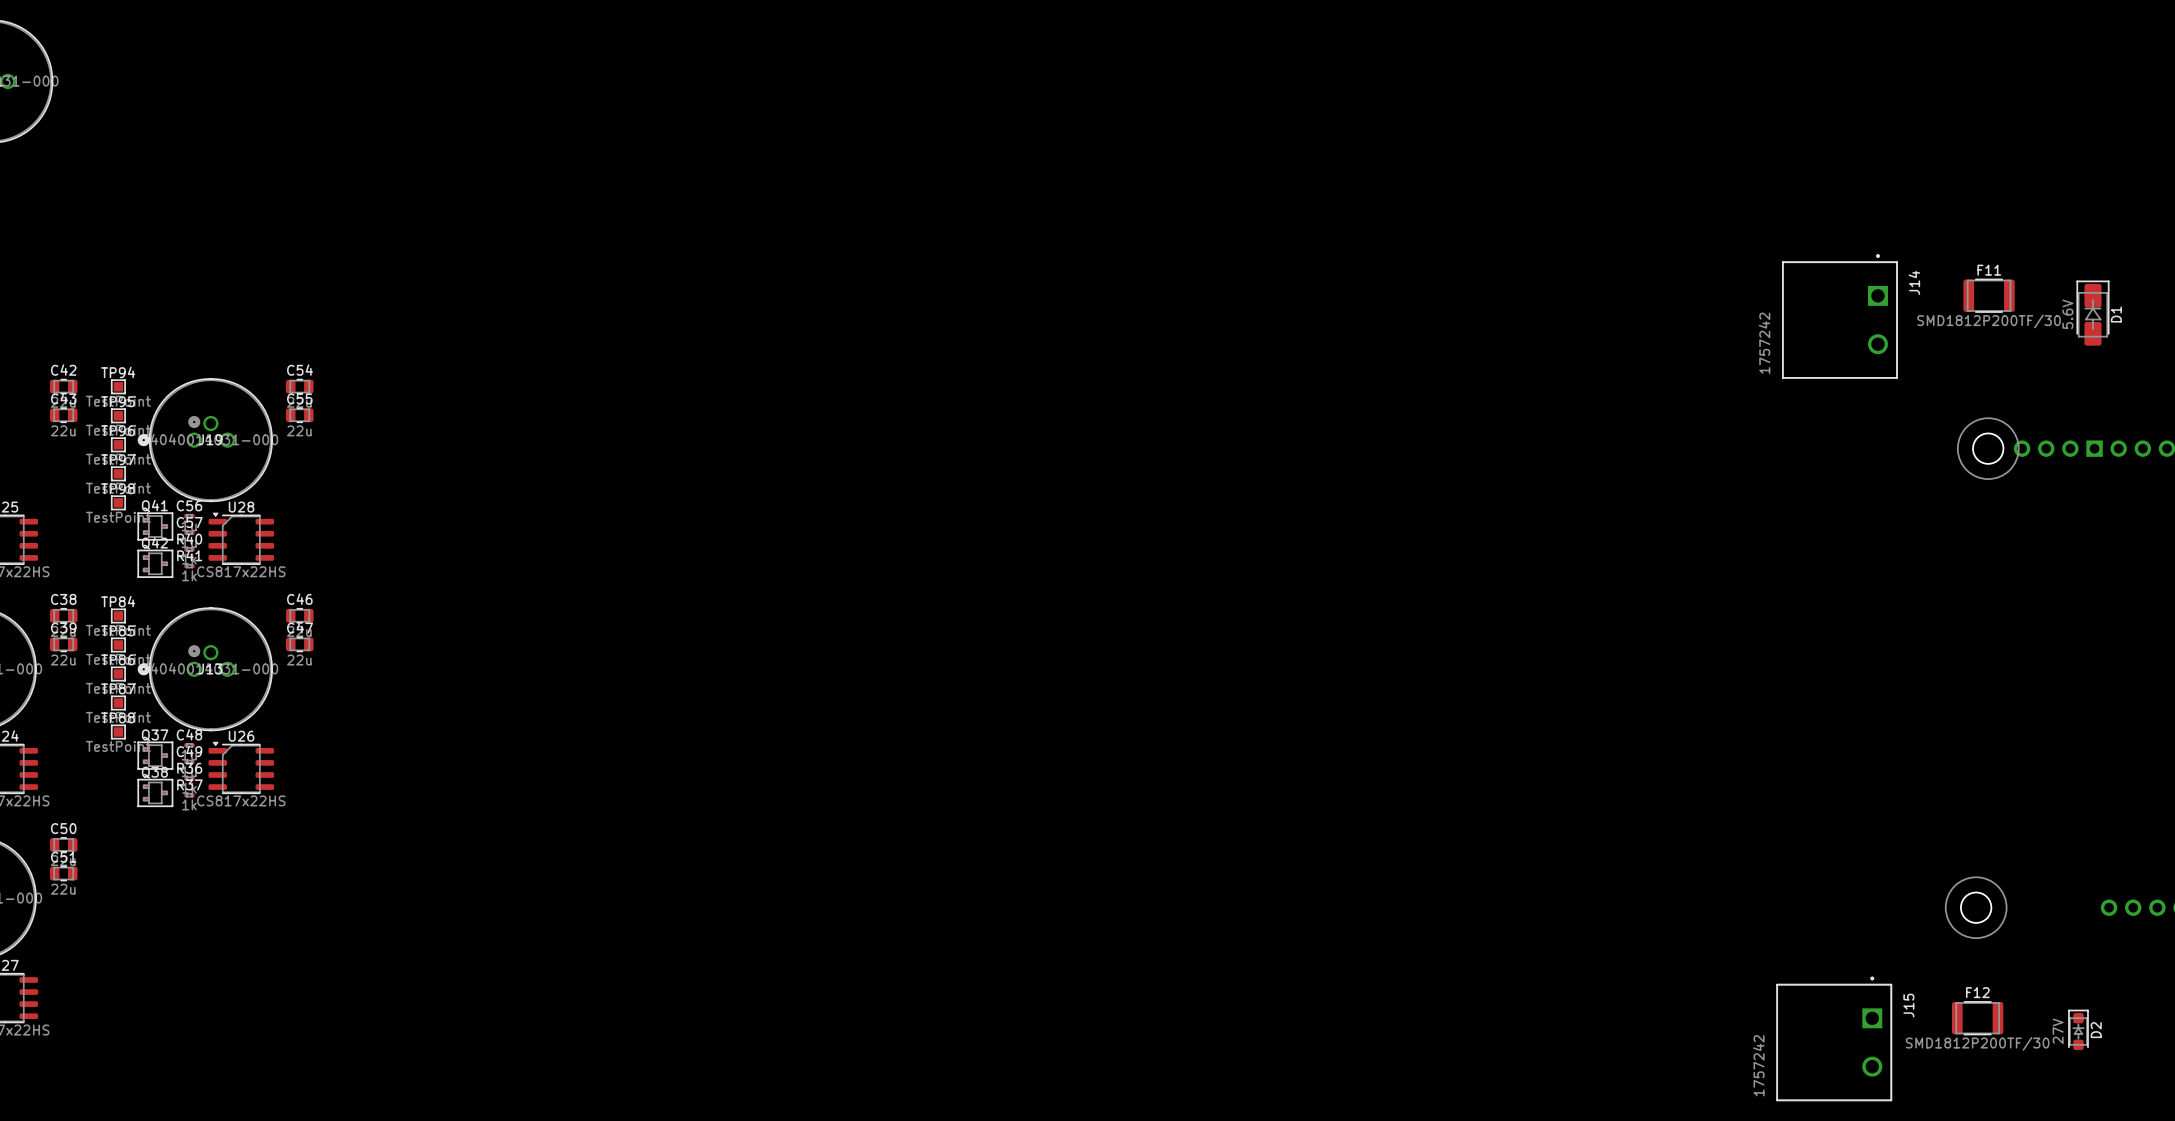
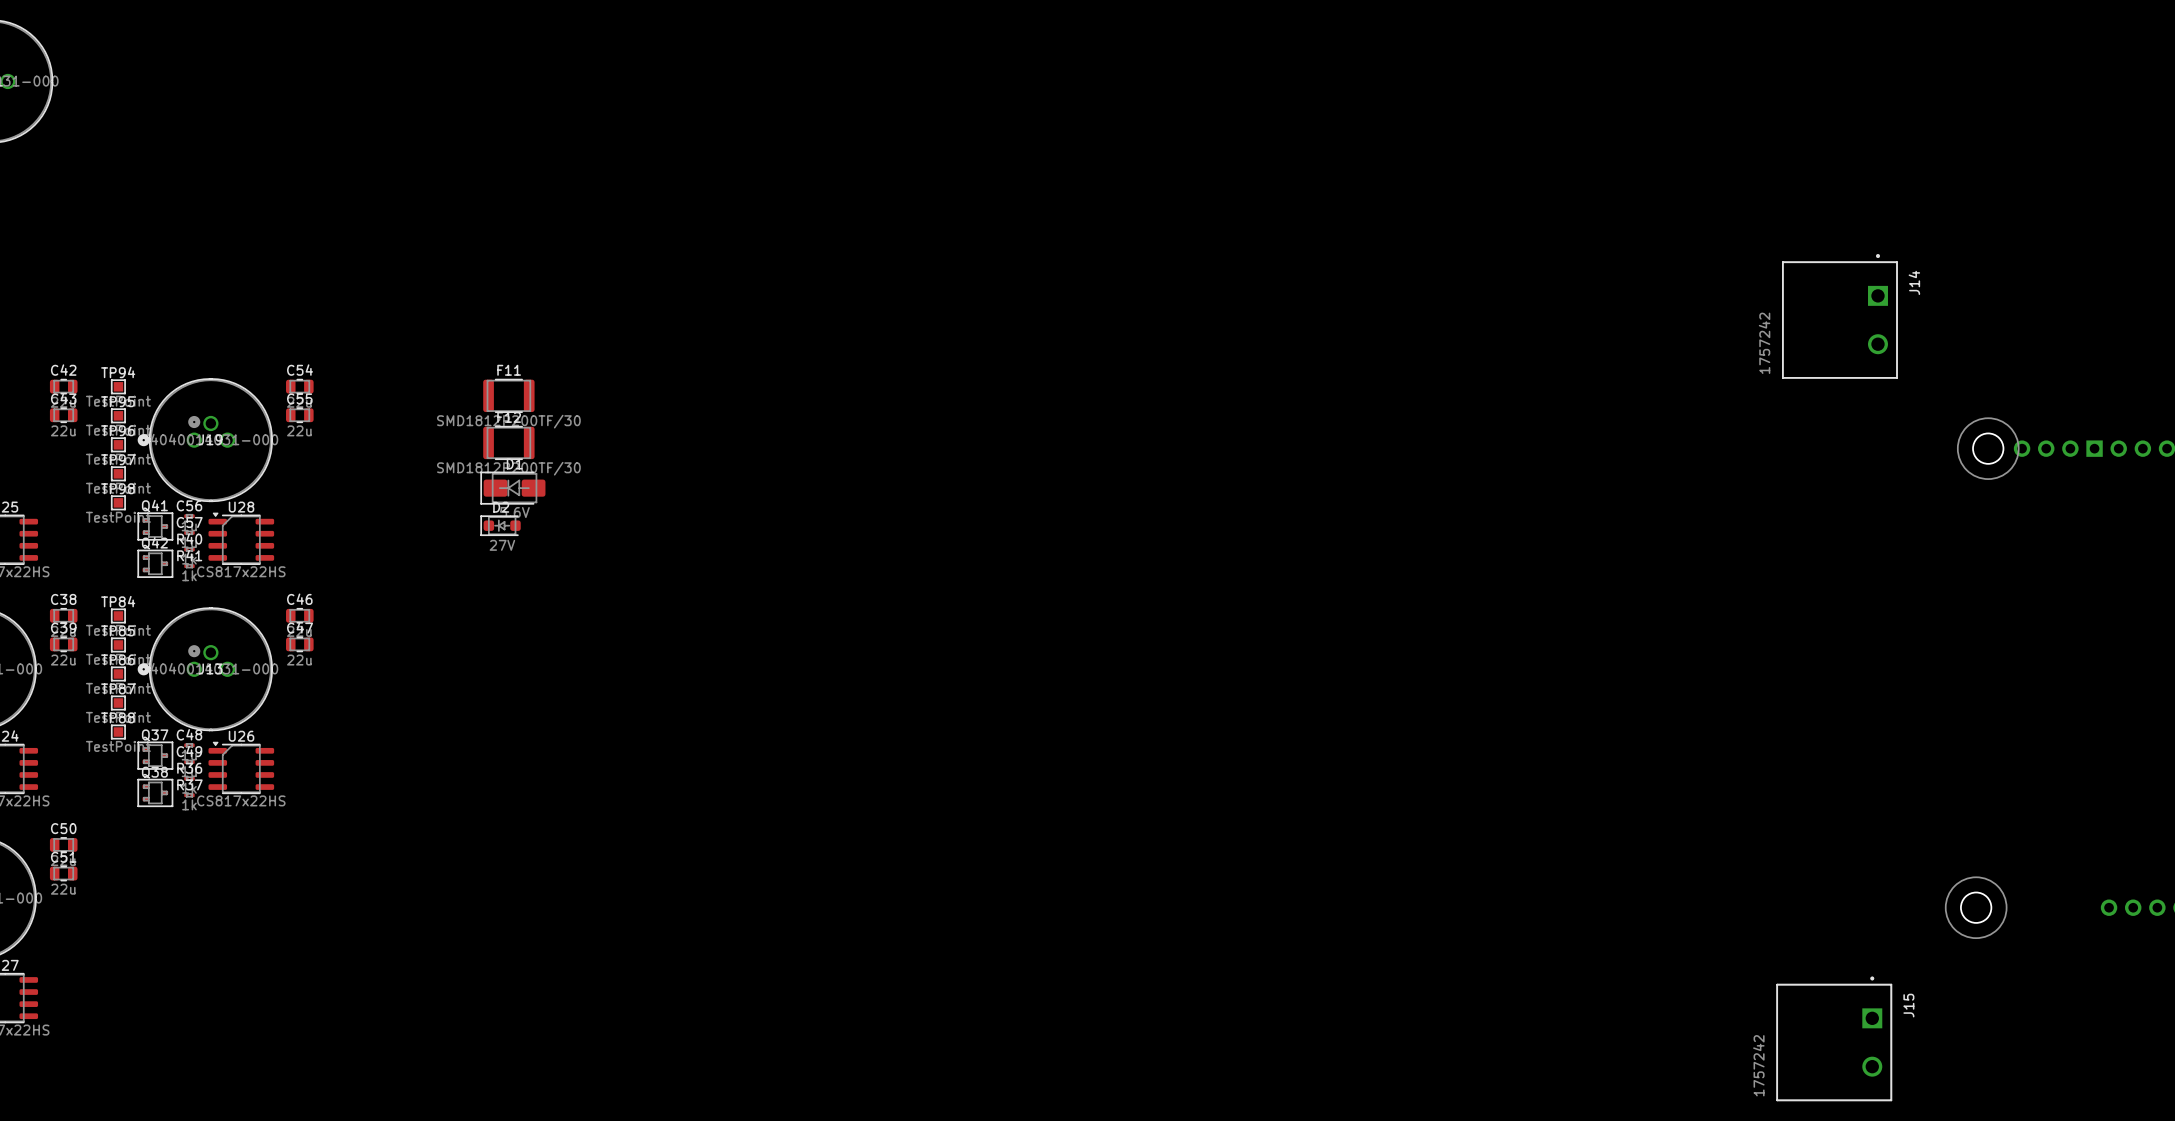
F11 position: (1989, 295) -> (508, 395)
D1 rotation: 0° (2092, 313) -> 90° counterclockwise (513, 488)
D1 position: (2092, 313) -> (513, 488)
F12 position: (1977, 1018) -> (508, 442)
D2 rotation: 0° (2078, 1029) -> 90° counterclockwise (500, 525)
D2 position: (2078, 1029) -> (500, 525)

